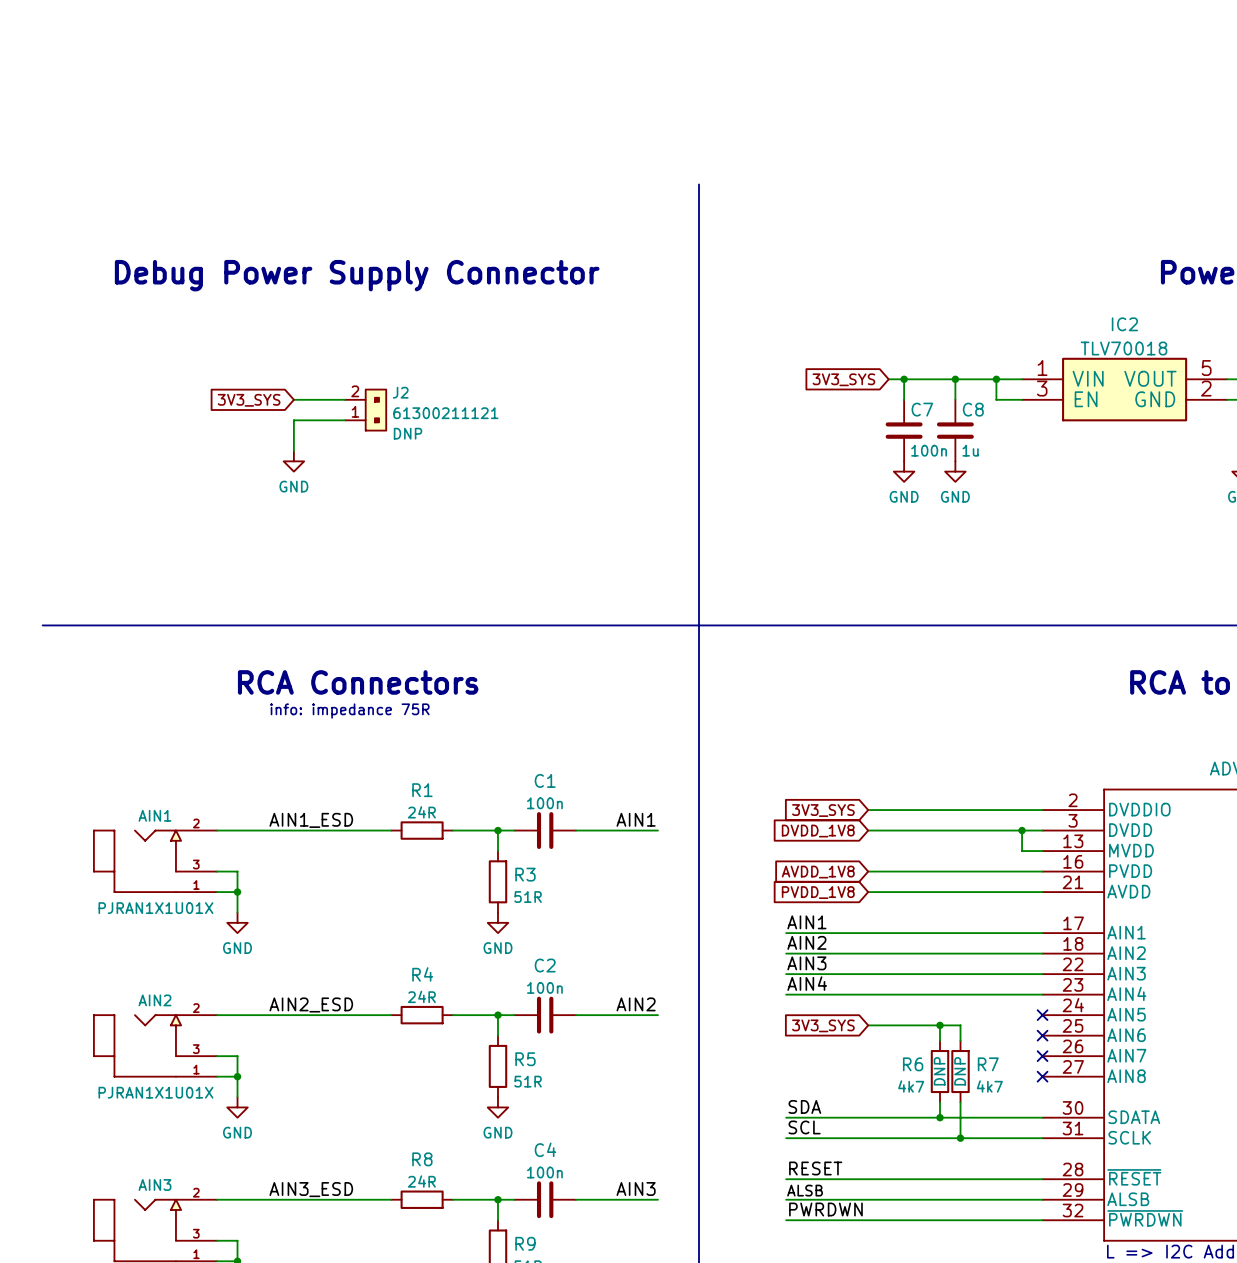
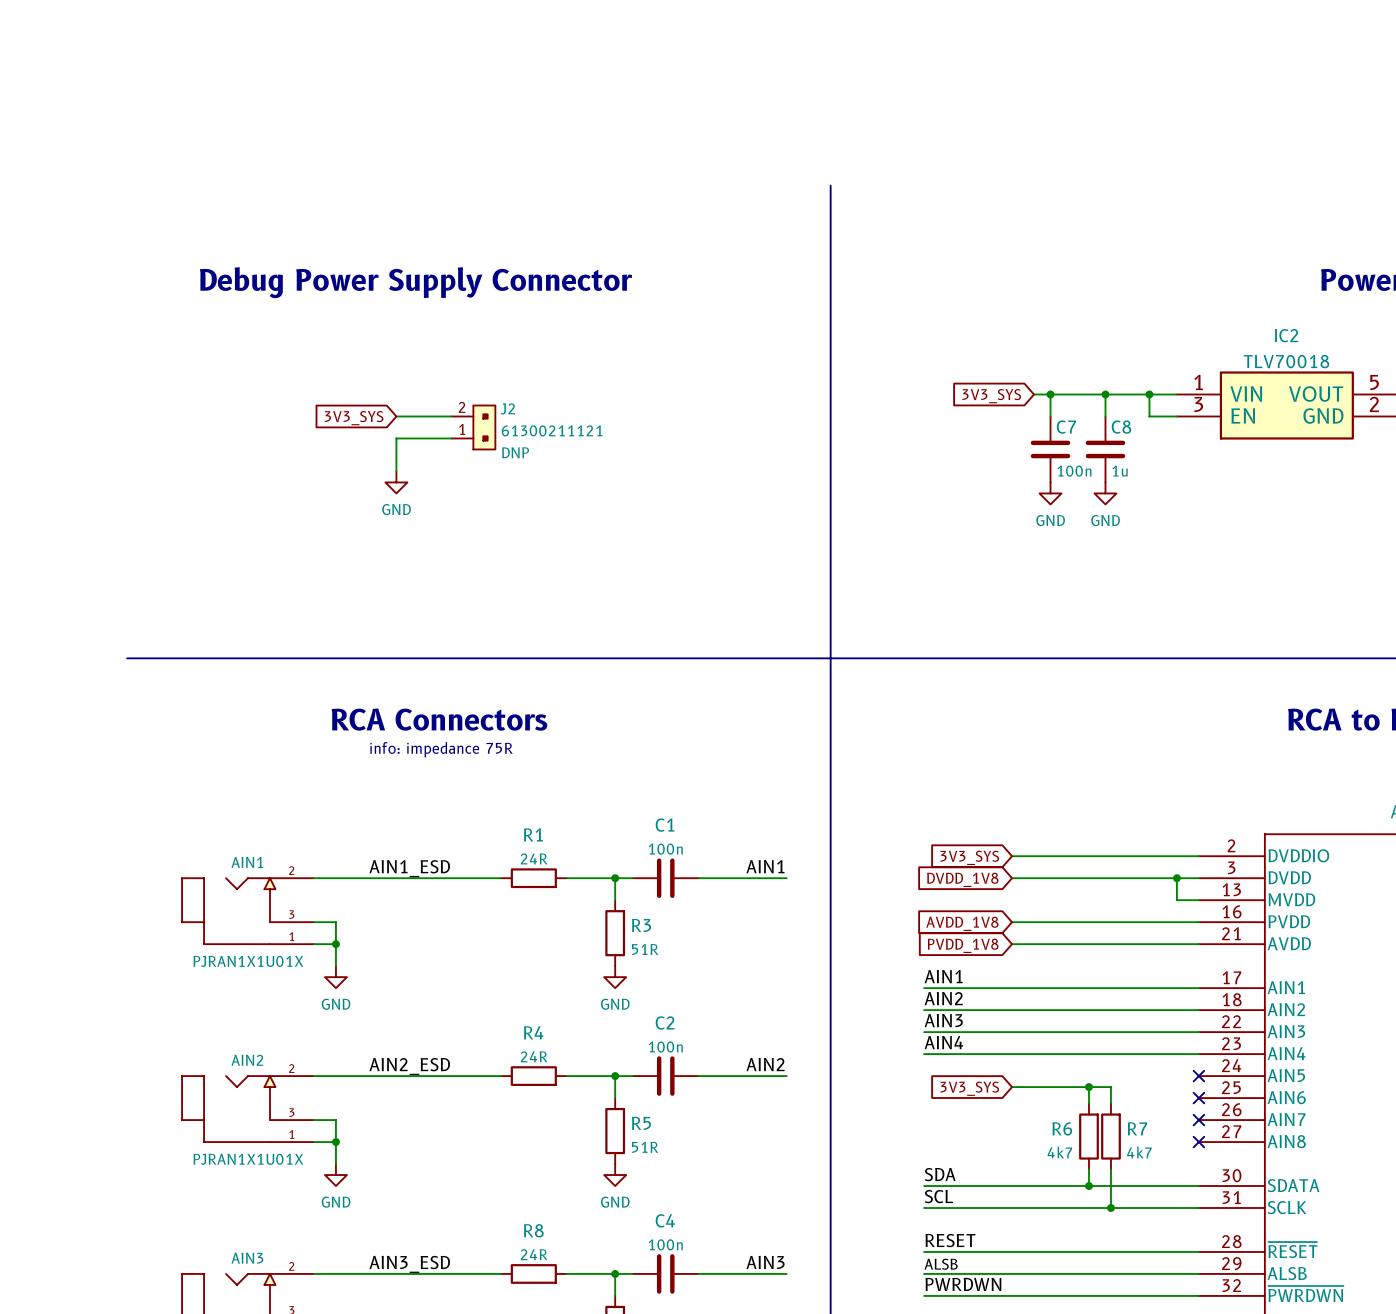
R6 text: DNP (939, 1071) -> none
R7 text: DNP (960, 1071) -> none

